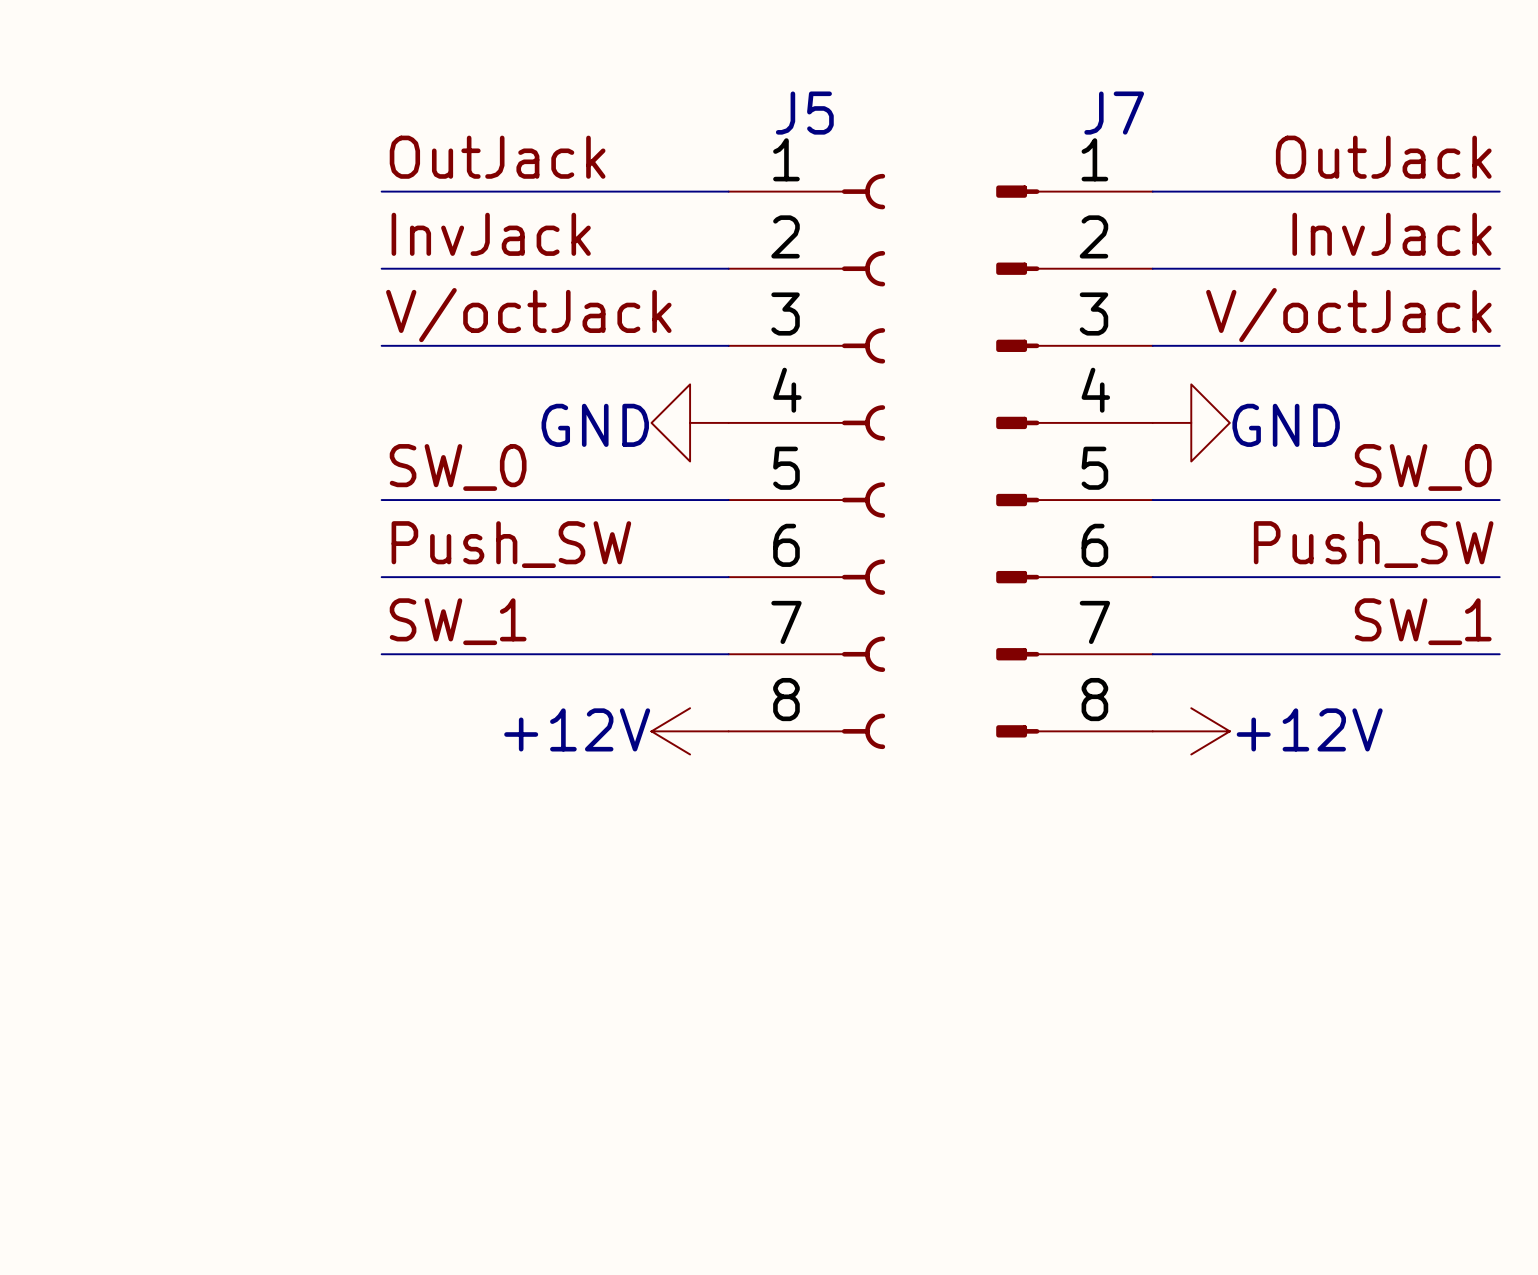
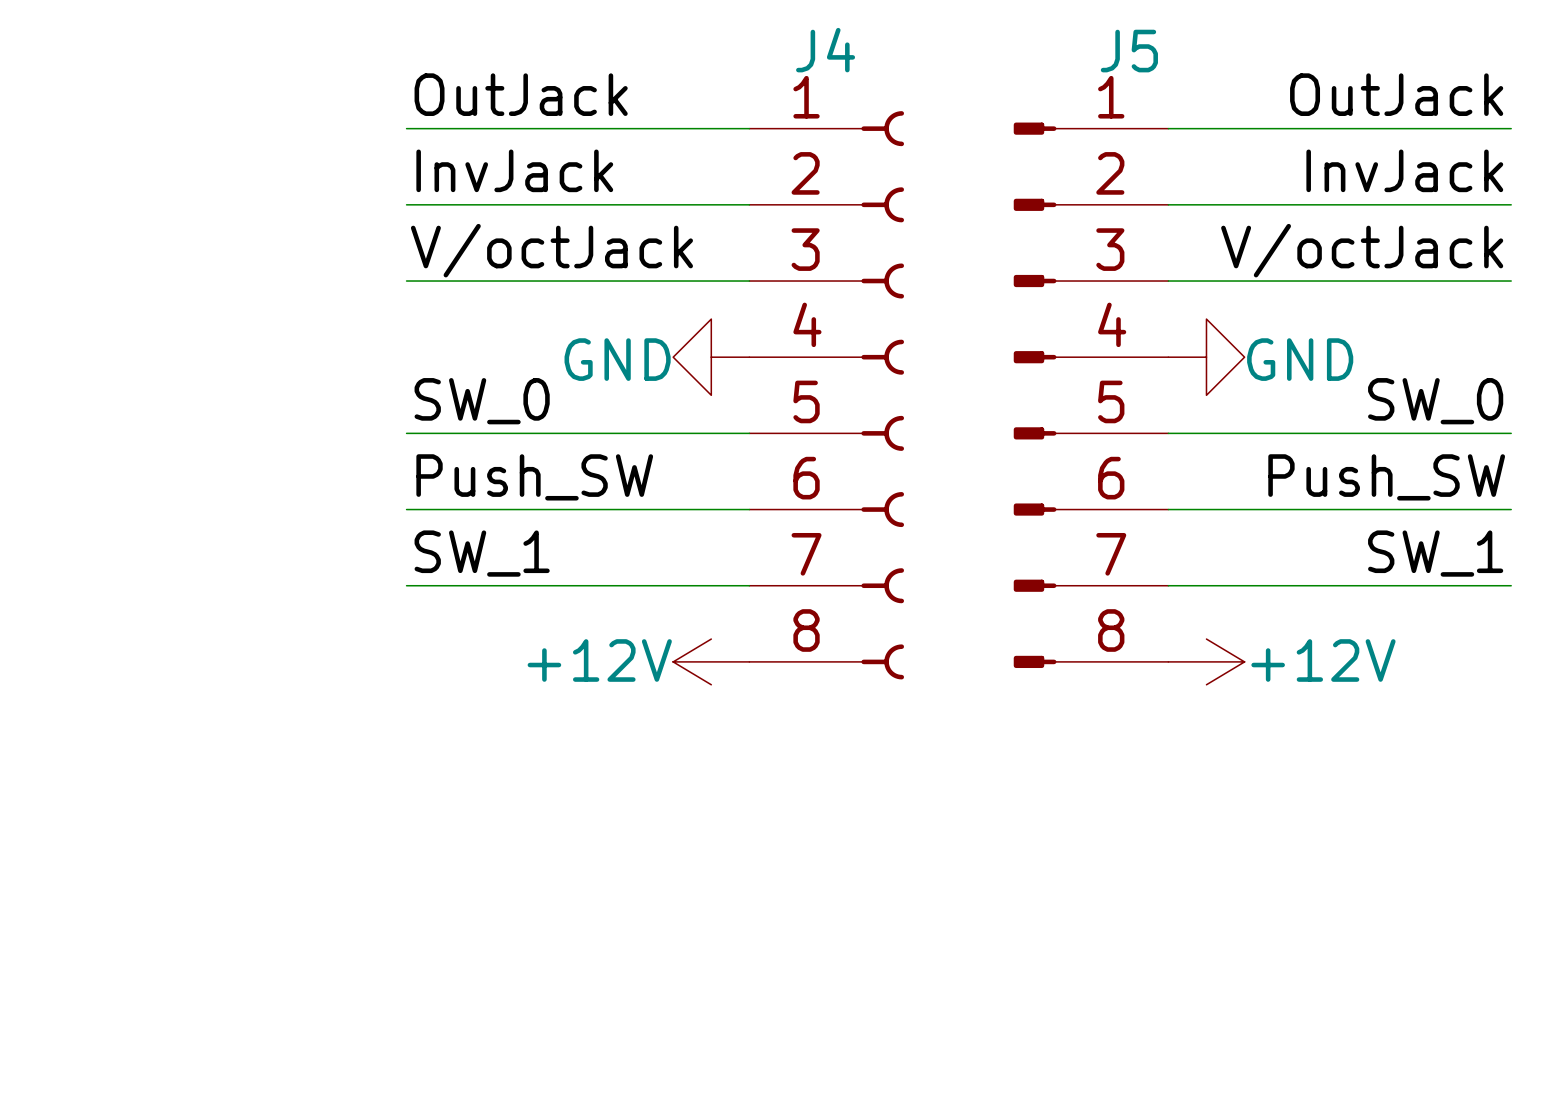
J7 name: J7 (1114, 113) -> J5 (1129, 51)
J5: (806, 461) -> none
J4: none -> (826, 395)

